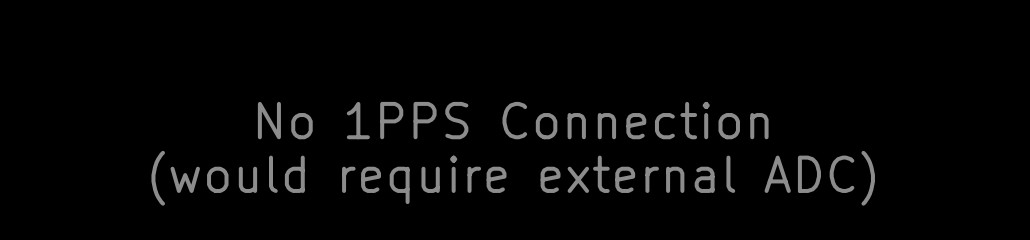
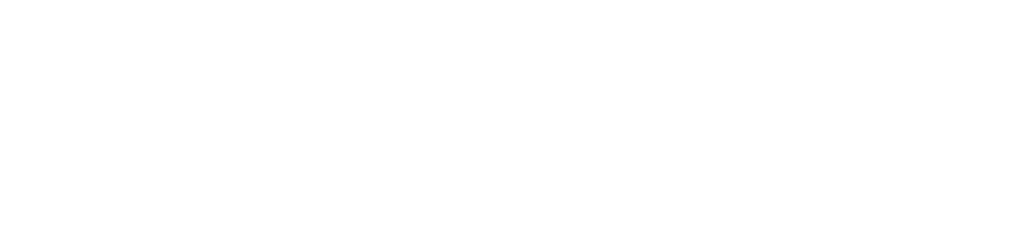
text: No 1PPS Connection (513, 120) -> none
text: (would require external ADC) (513, 178) -> none

